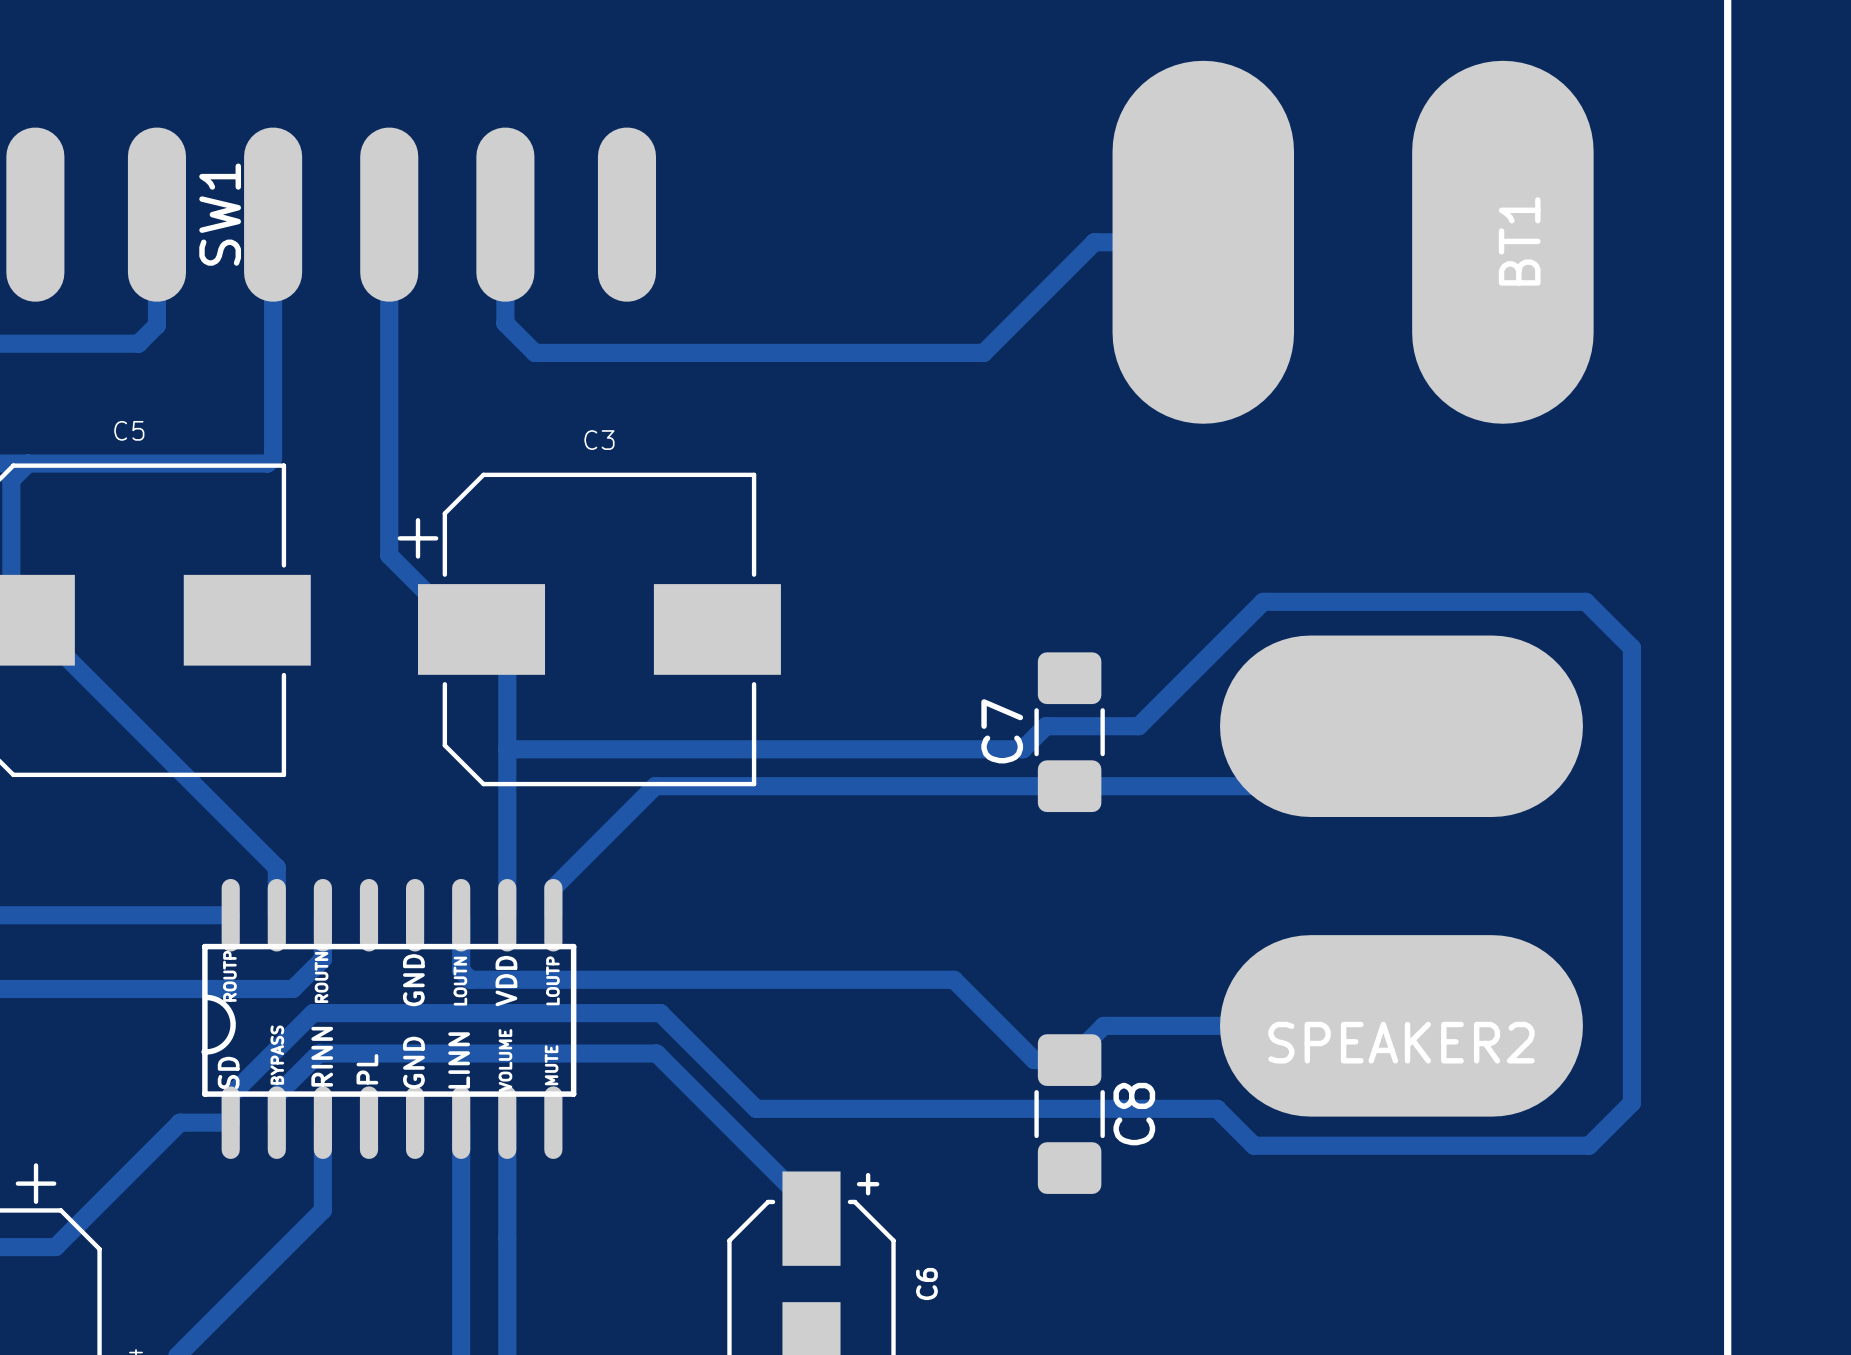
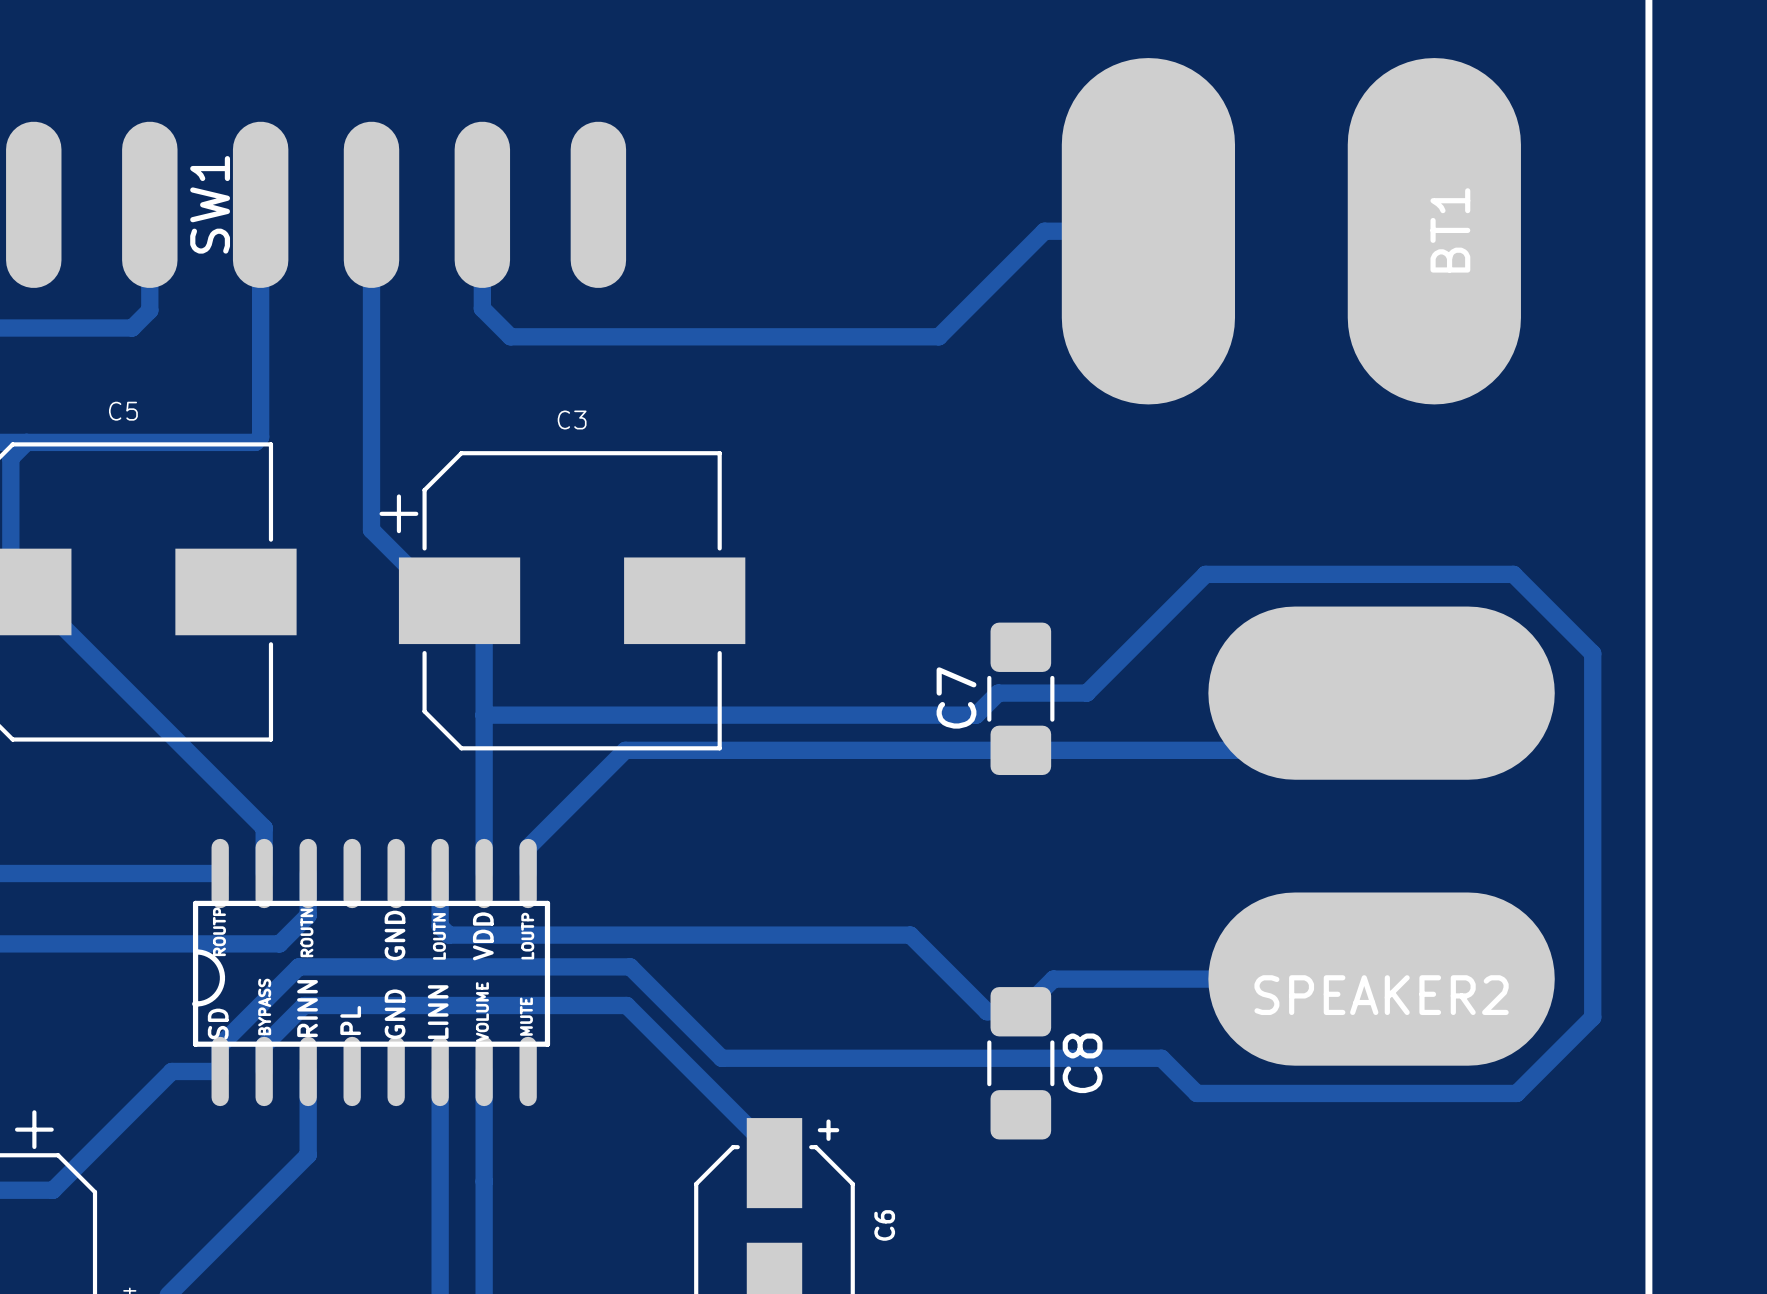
track: (1631, 647) (1631, 1102) -> (1557, 618) (1592, 653) (1592, 1017) (1557, 1052)
part position: (1401, 876) -> (1381, 836)

